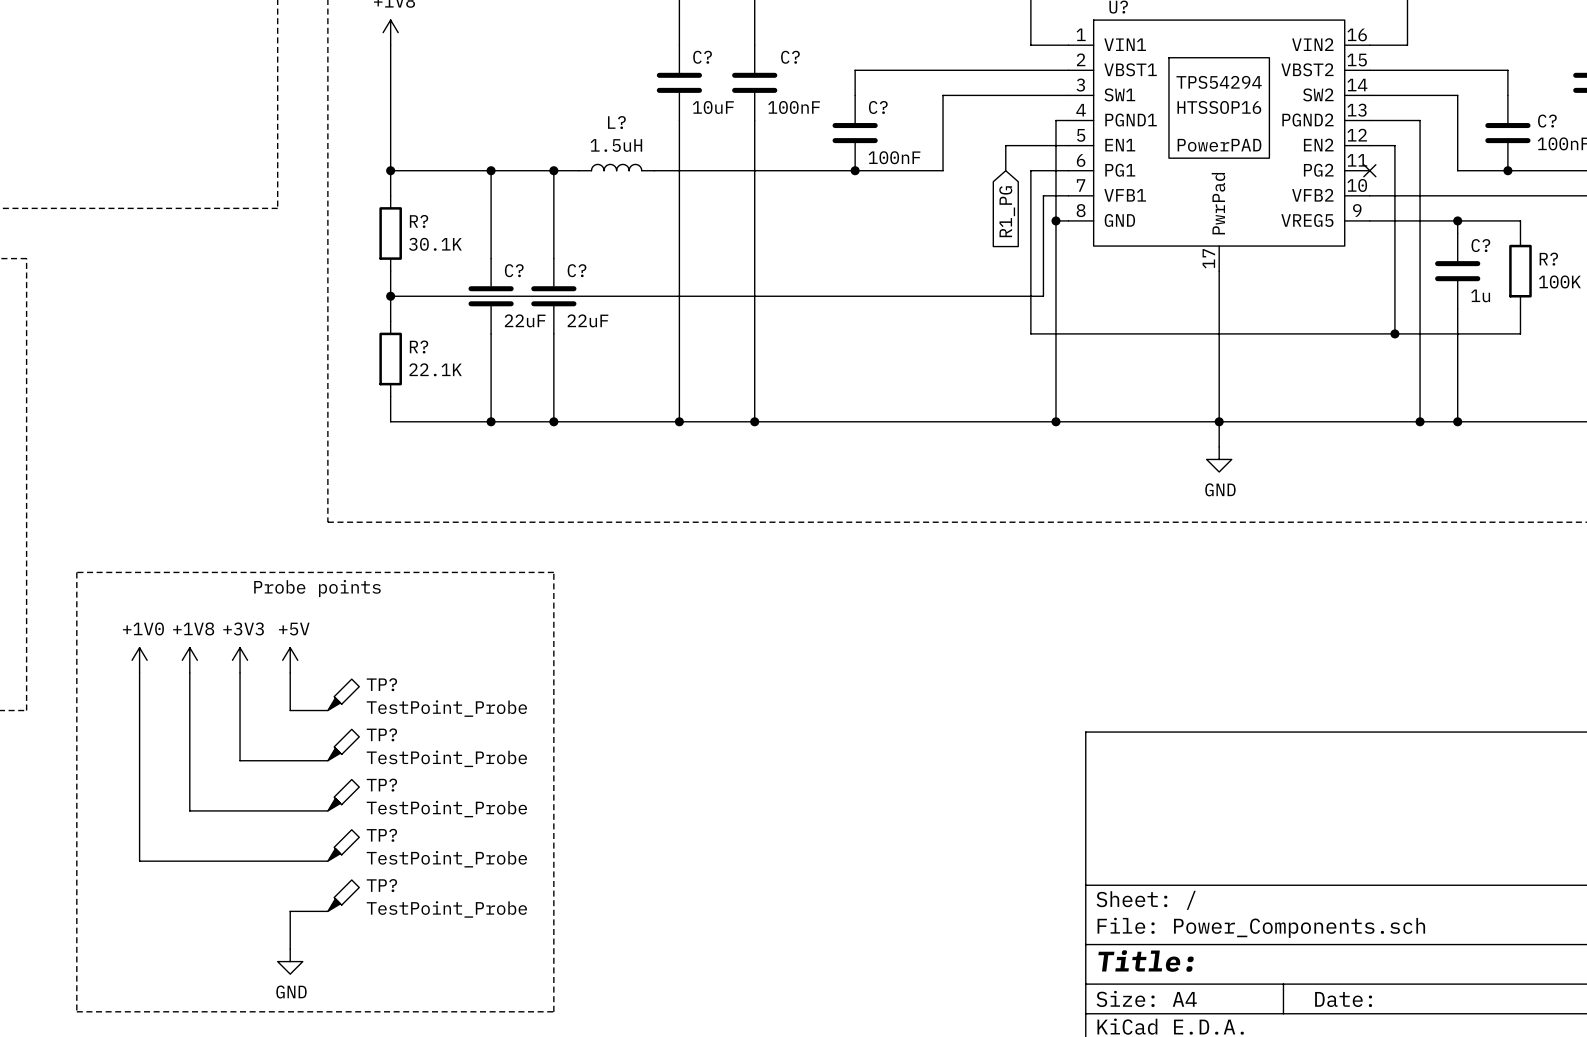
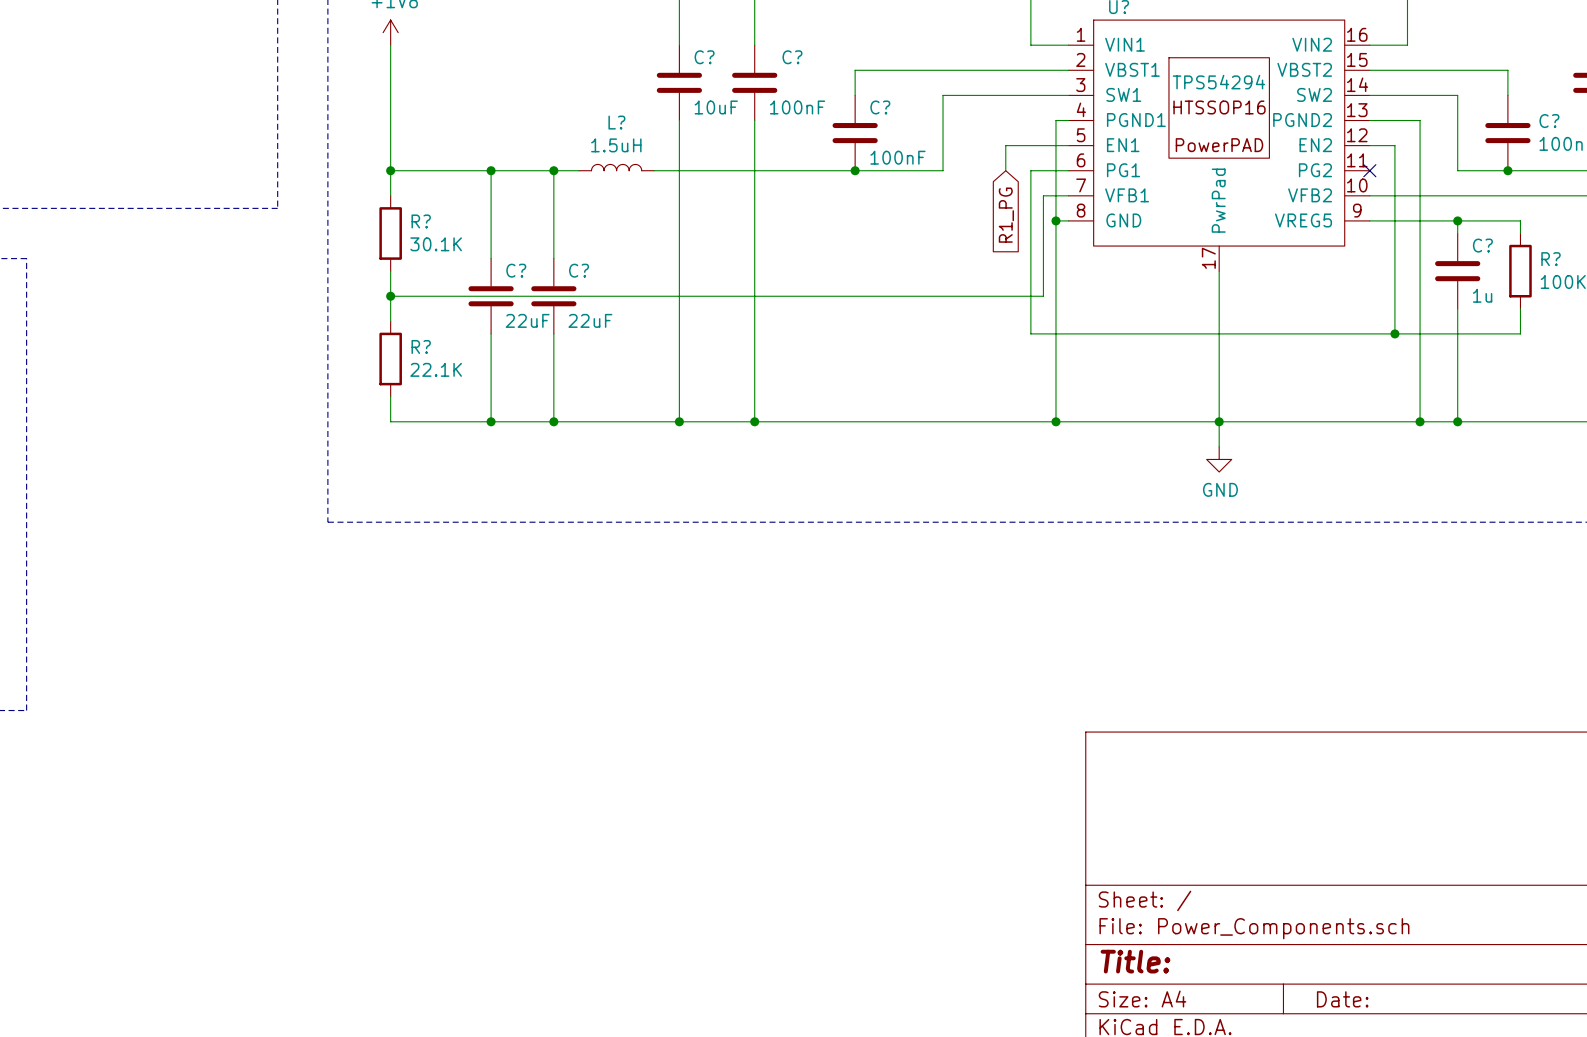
line: (76, 572) (76, 1011) (553, 1011) (553, 572) (76, 572) -> none
text: Probe points (317, 588) -> none
power symbol: +1V0 (139, 660) -> none
power symbol: +1V8 (189, 660) -> none
power symbol: +3V3 (240, 660) -> none
power symbol: +5V (290, 660) -> none
wire: (139, 672) (139, 861) (327, 861) -> none
wire: (189, 672) (189, 810) (327, 810) -> none
wire: (240, 672) (240, 760) (327, 760) -> none
wire: (290, 672) (290, 710) (327, 710) -> none
TP?: TestPoint_Probe (343, 694) -> none
TP?: TestPoint_Probe (343, 745) -> none
TP?: TestPoint_Probe (343, 795) -> none
TP?: TestPoint_Probe (343, 845) -> none
TP?: TestPoint_Probe (343, 895) -> none
wire: (327, 911) (290, 911) (290, 949) -> none
power symbol: GND (290, 961) -> none

